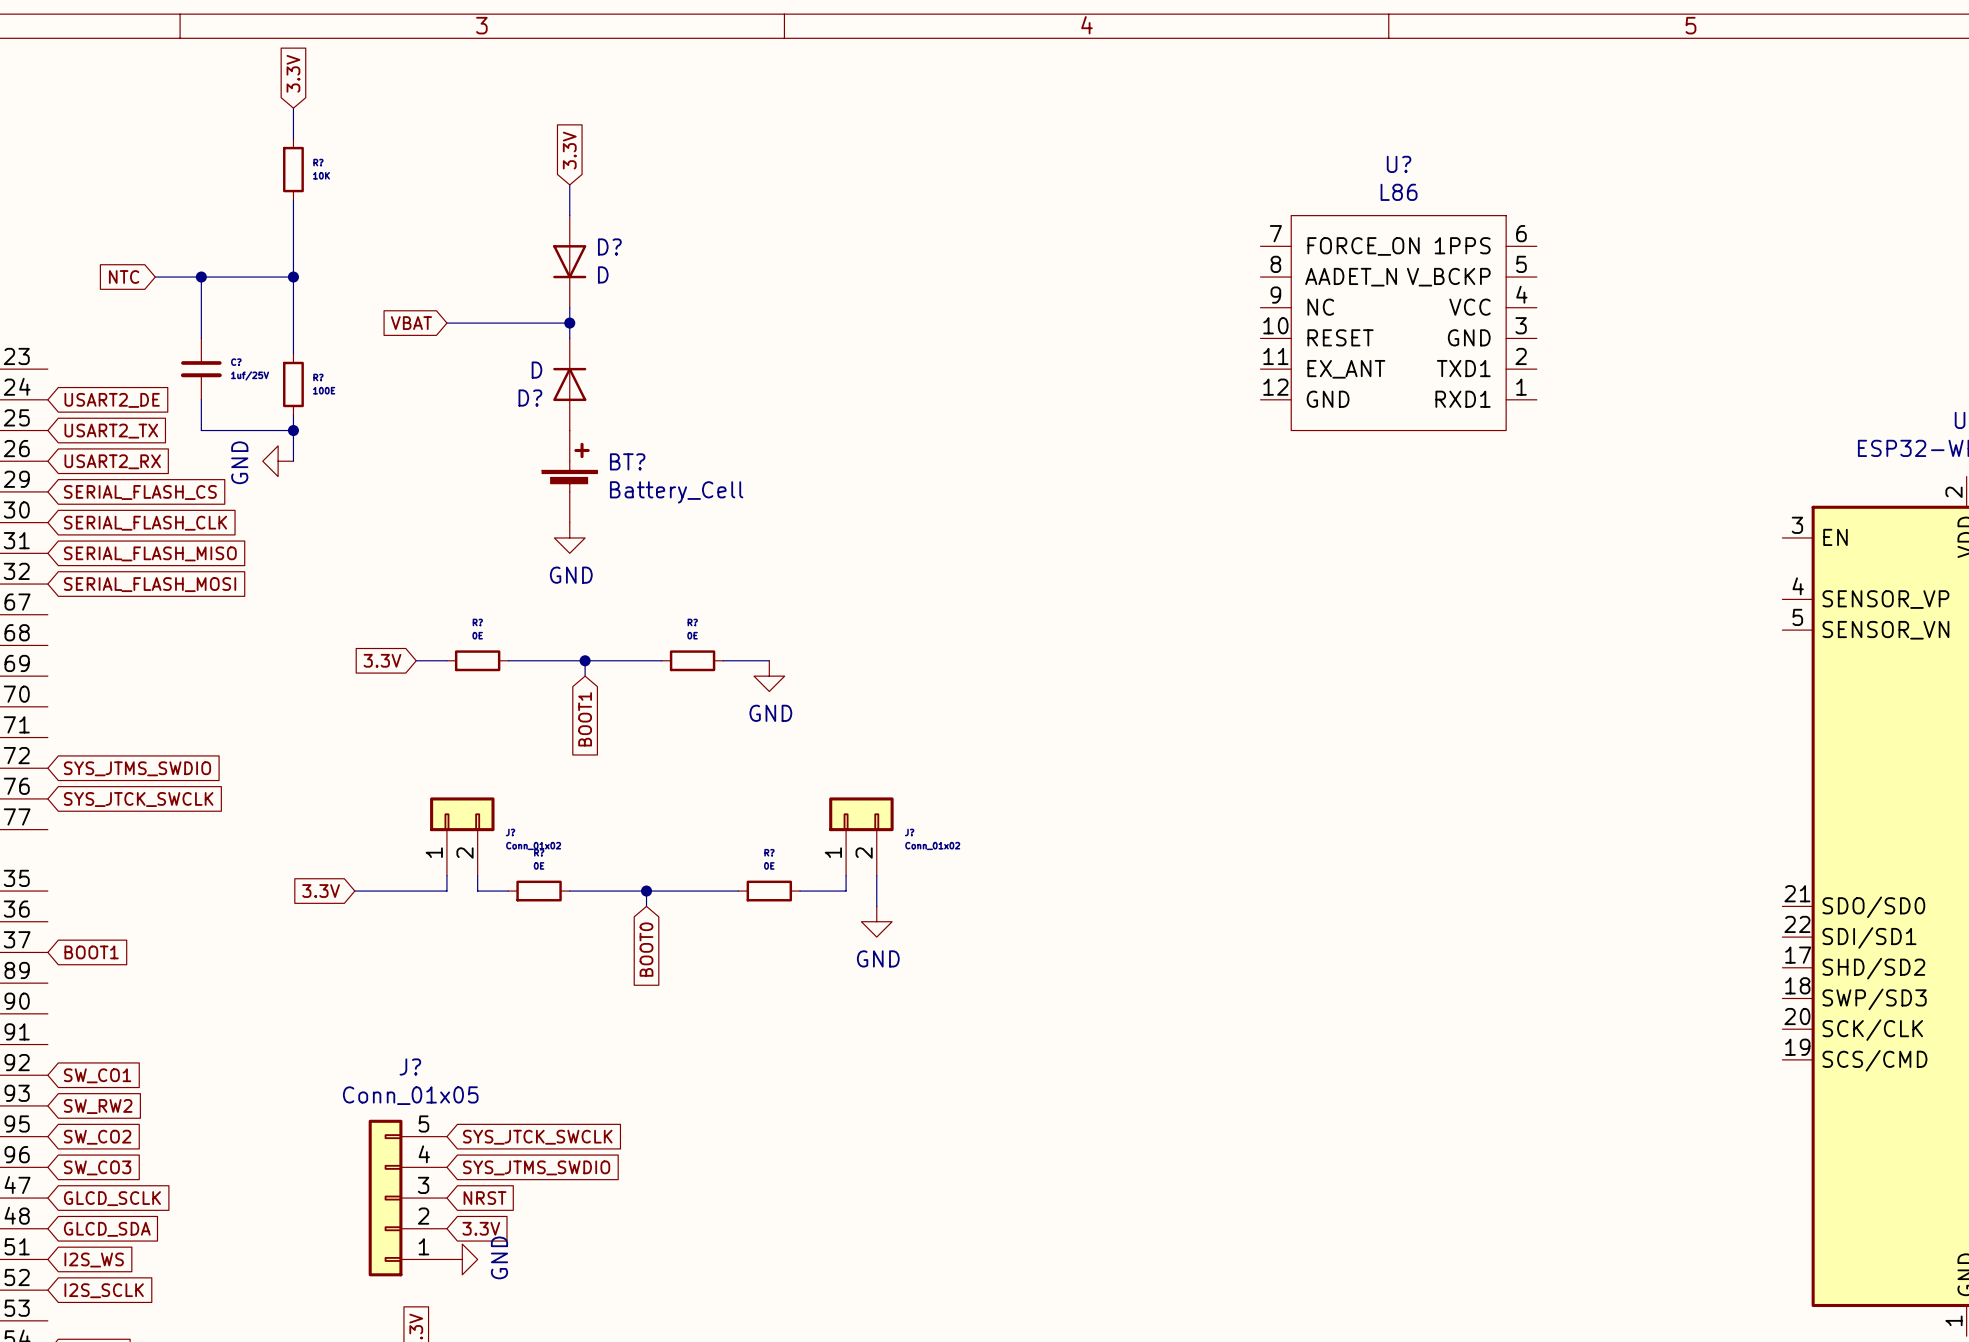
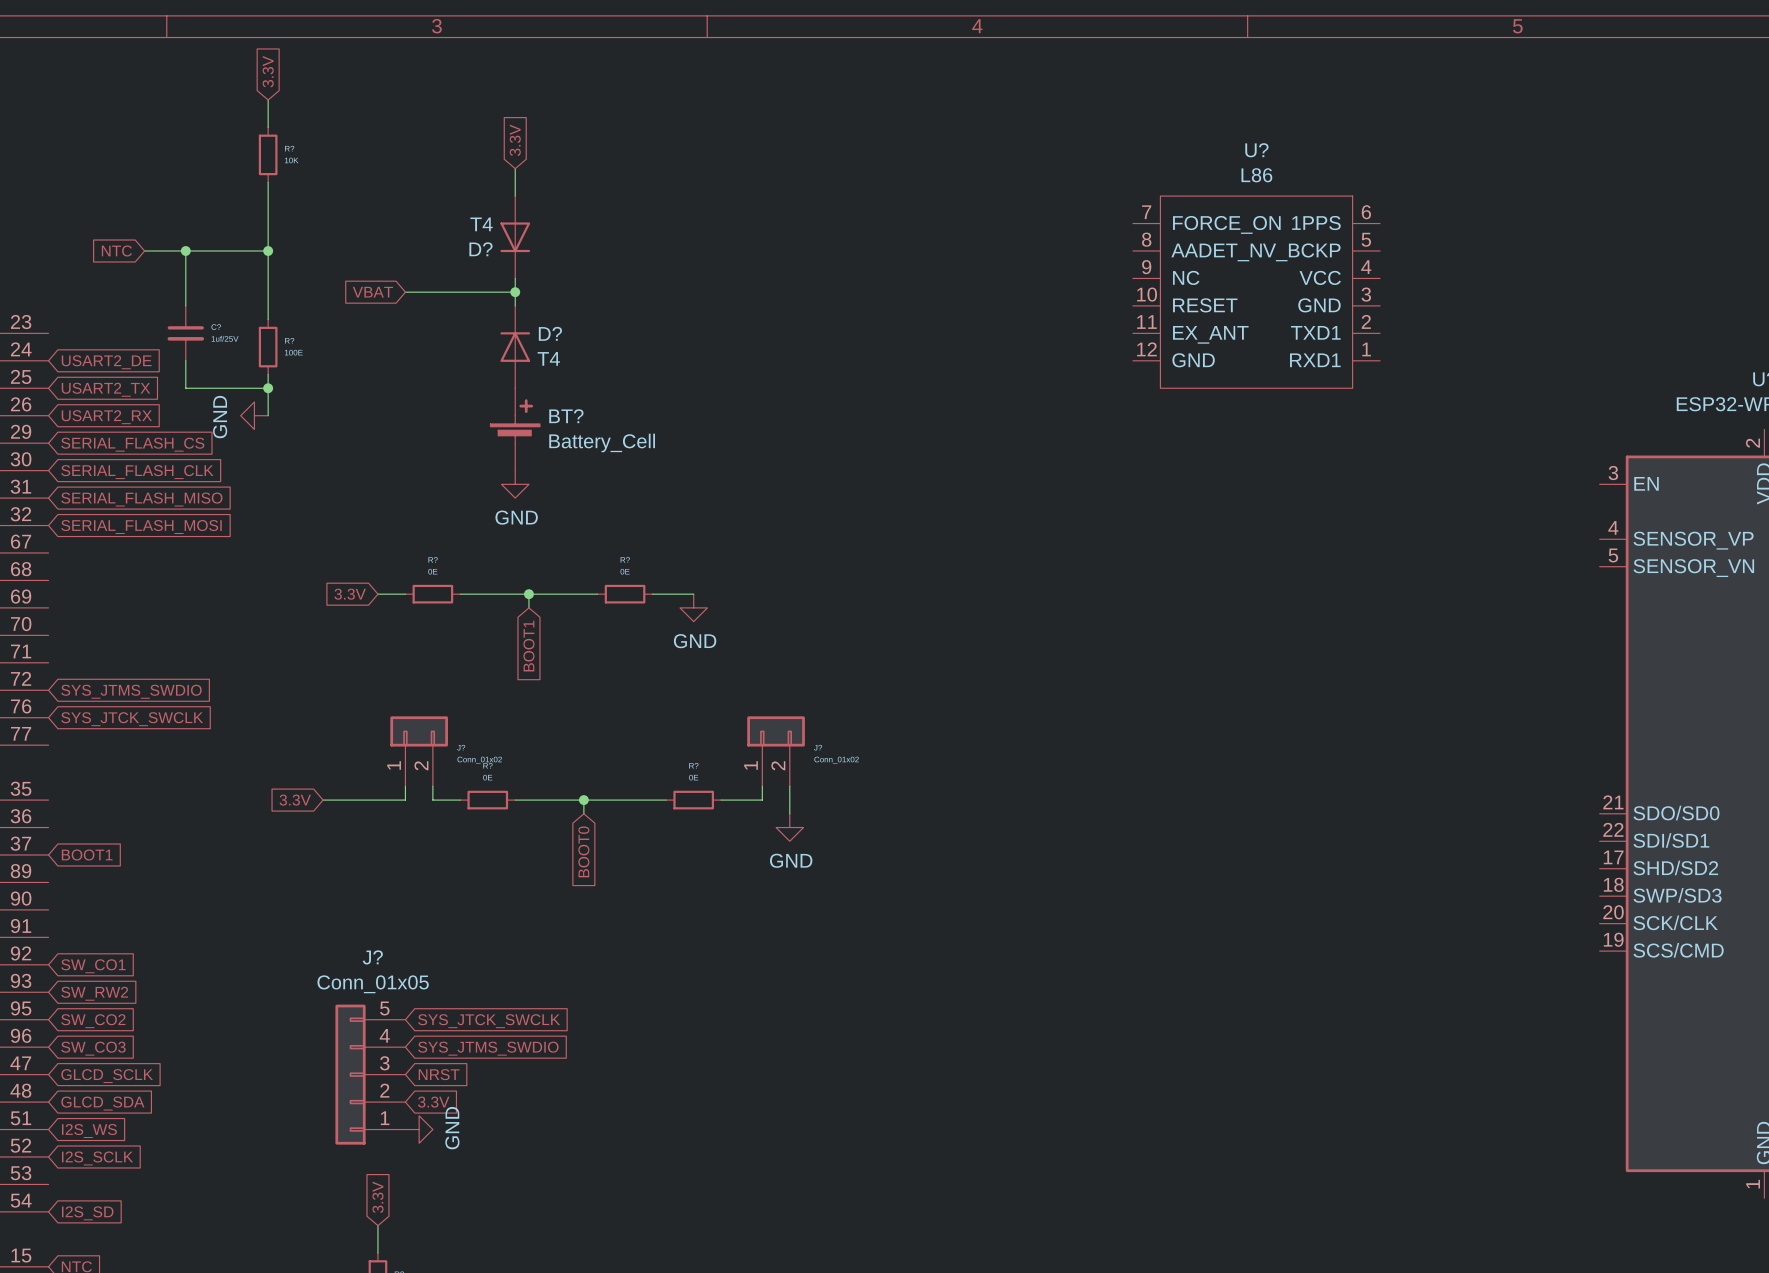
D? name position: D? (609, 246) -> D? (480, 249)
D? value: D (603, 274) -> T4 (481, 224)
D? value: D (536, 370) -> T4 (548, 358)
D? name position: D? (530, 398) -> D? (550, 333)

